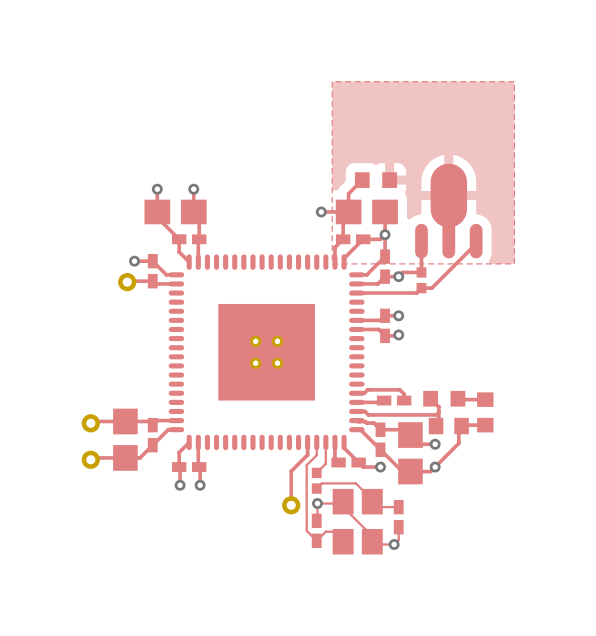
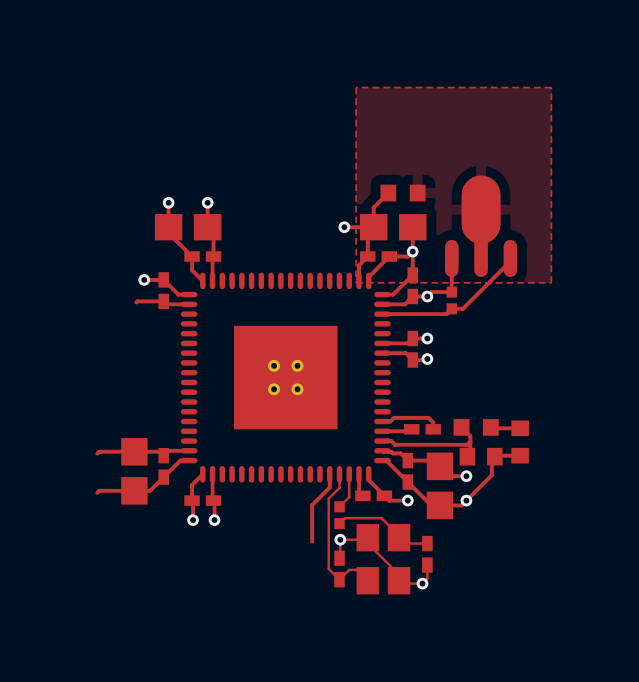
part: (127, 282) -> none
part: (90, 423) -> none
part: (90, 459) -> none
part: (291, 505) -> none

